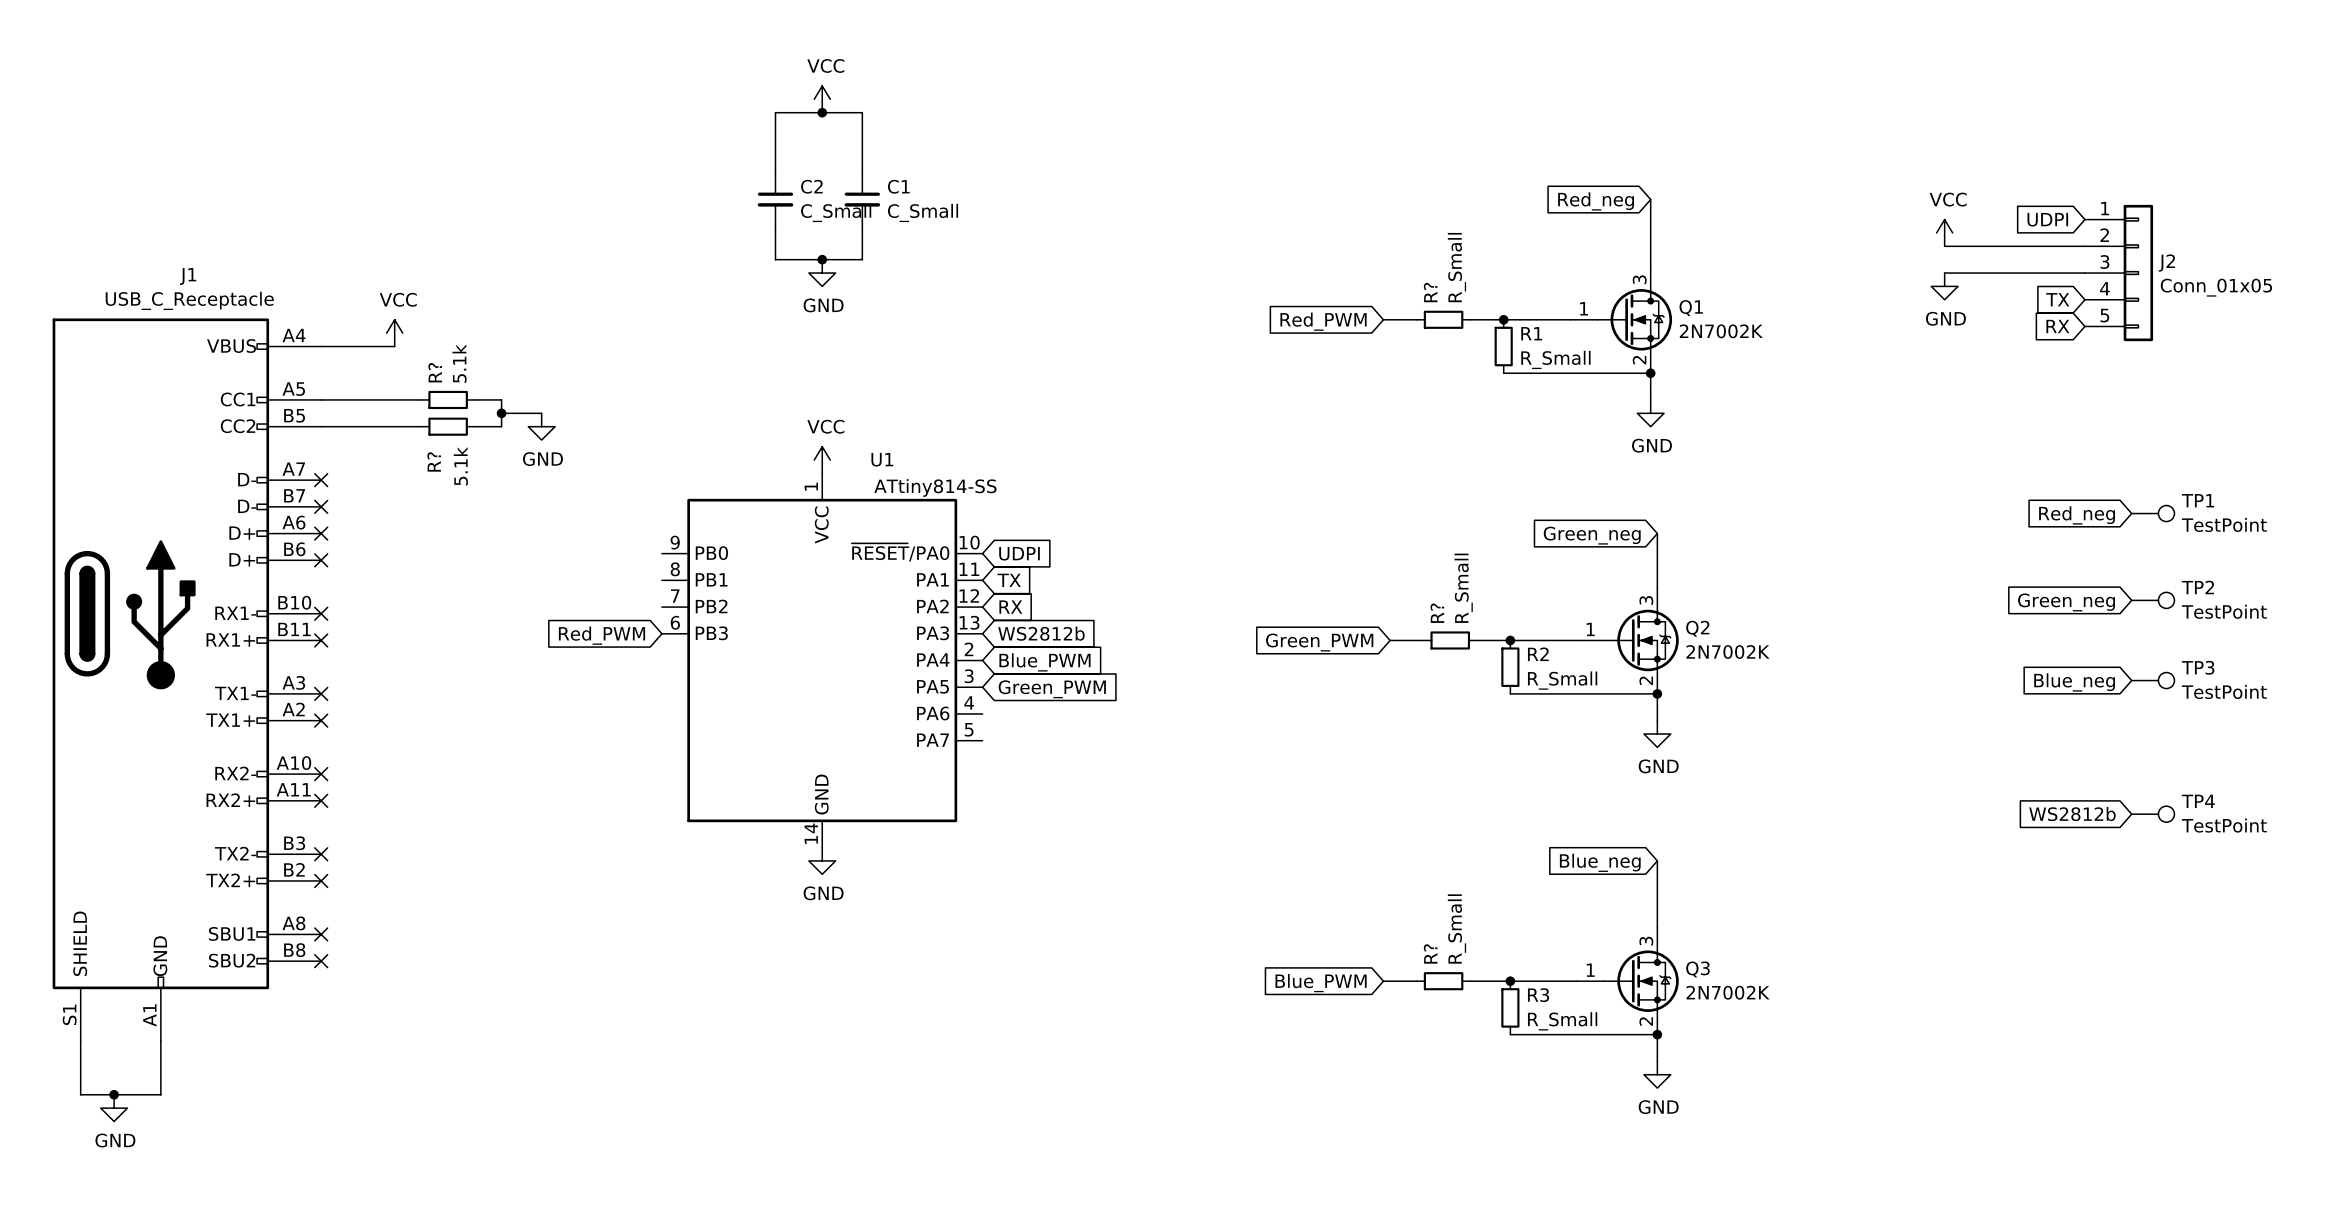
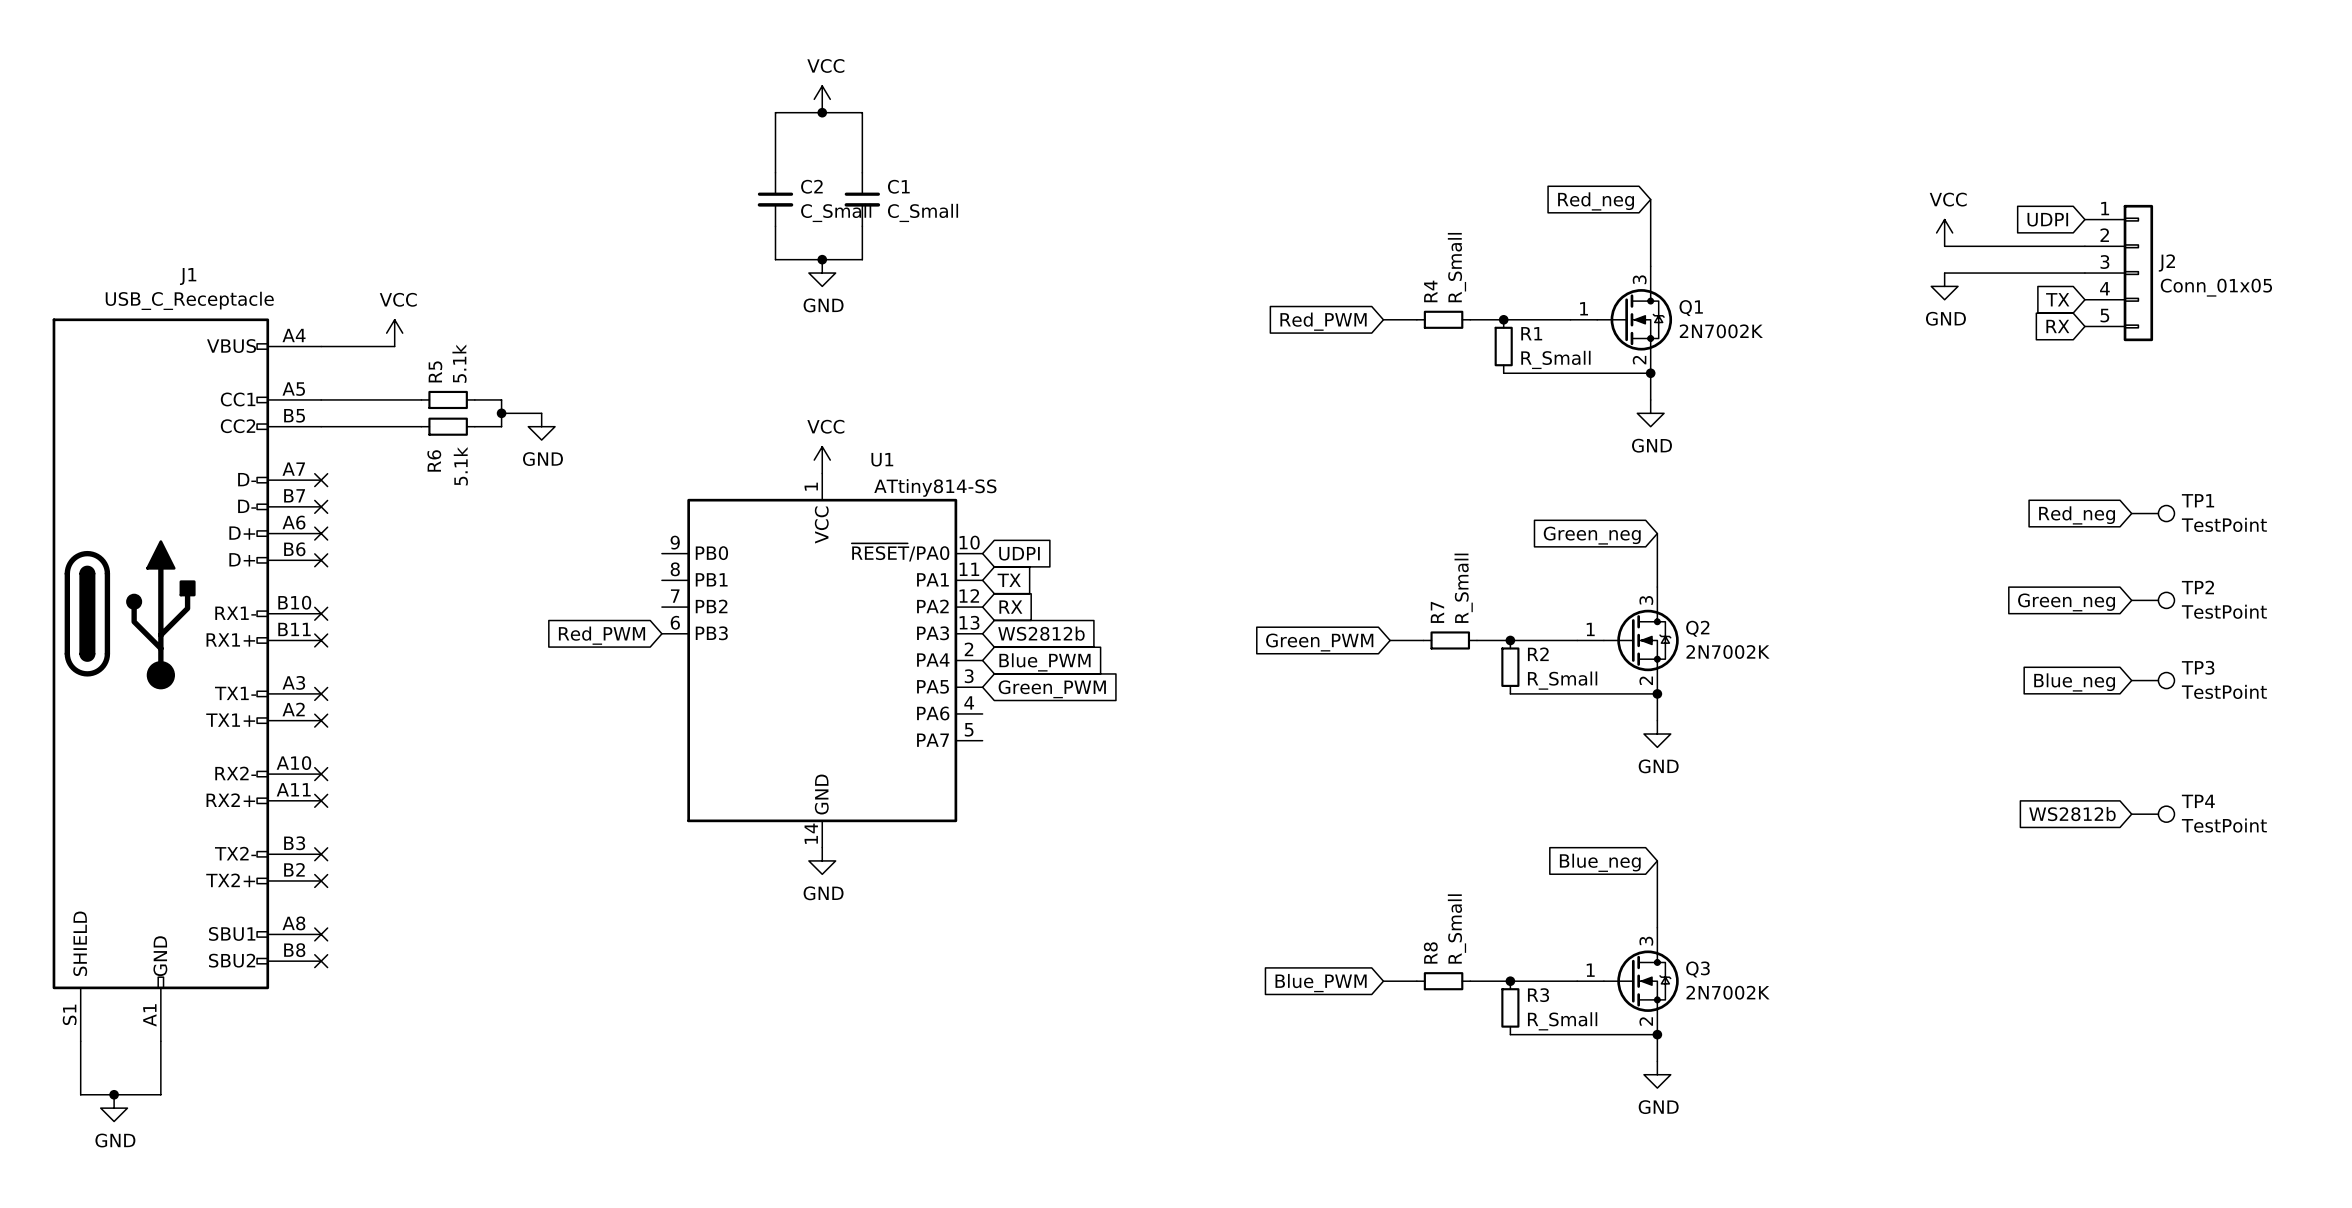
R? name: R? (1430, 292) -> R4 (1430, 291)
R? name: R? (435, 372) -> R5 (435, 371)
R? name: R? (434, 461) -> R6 (434, 460)
R? name: R? (1437, 613) -> R7 (1437, 612)
R? name: R? (1430, 953) -> R8 (1430, 952)

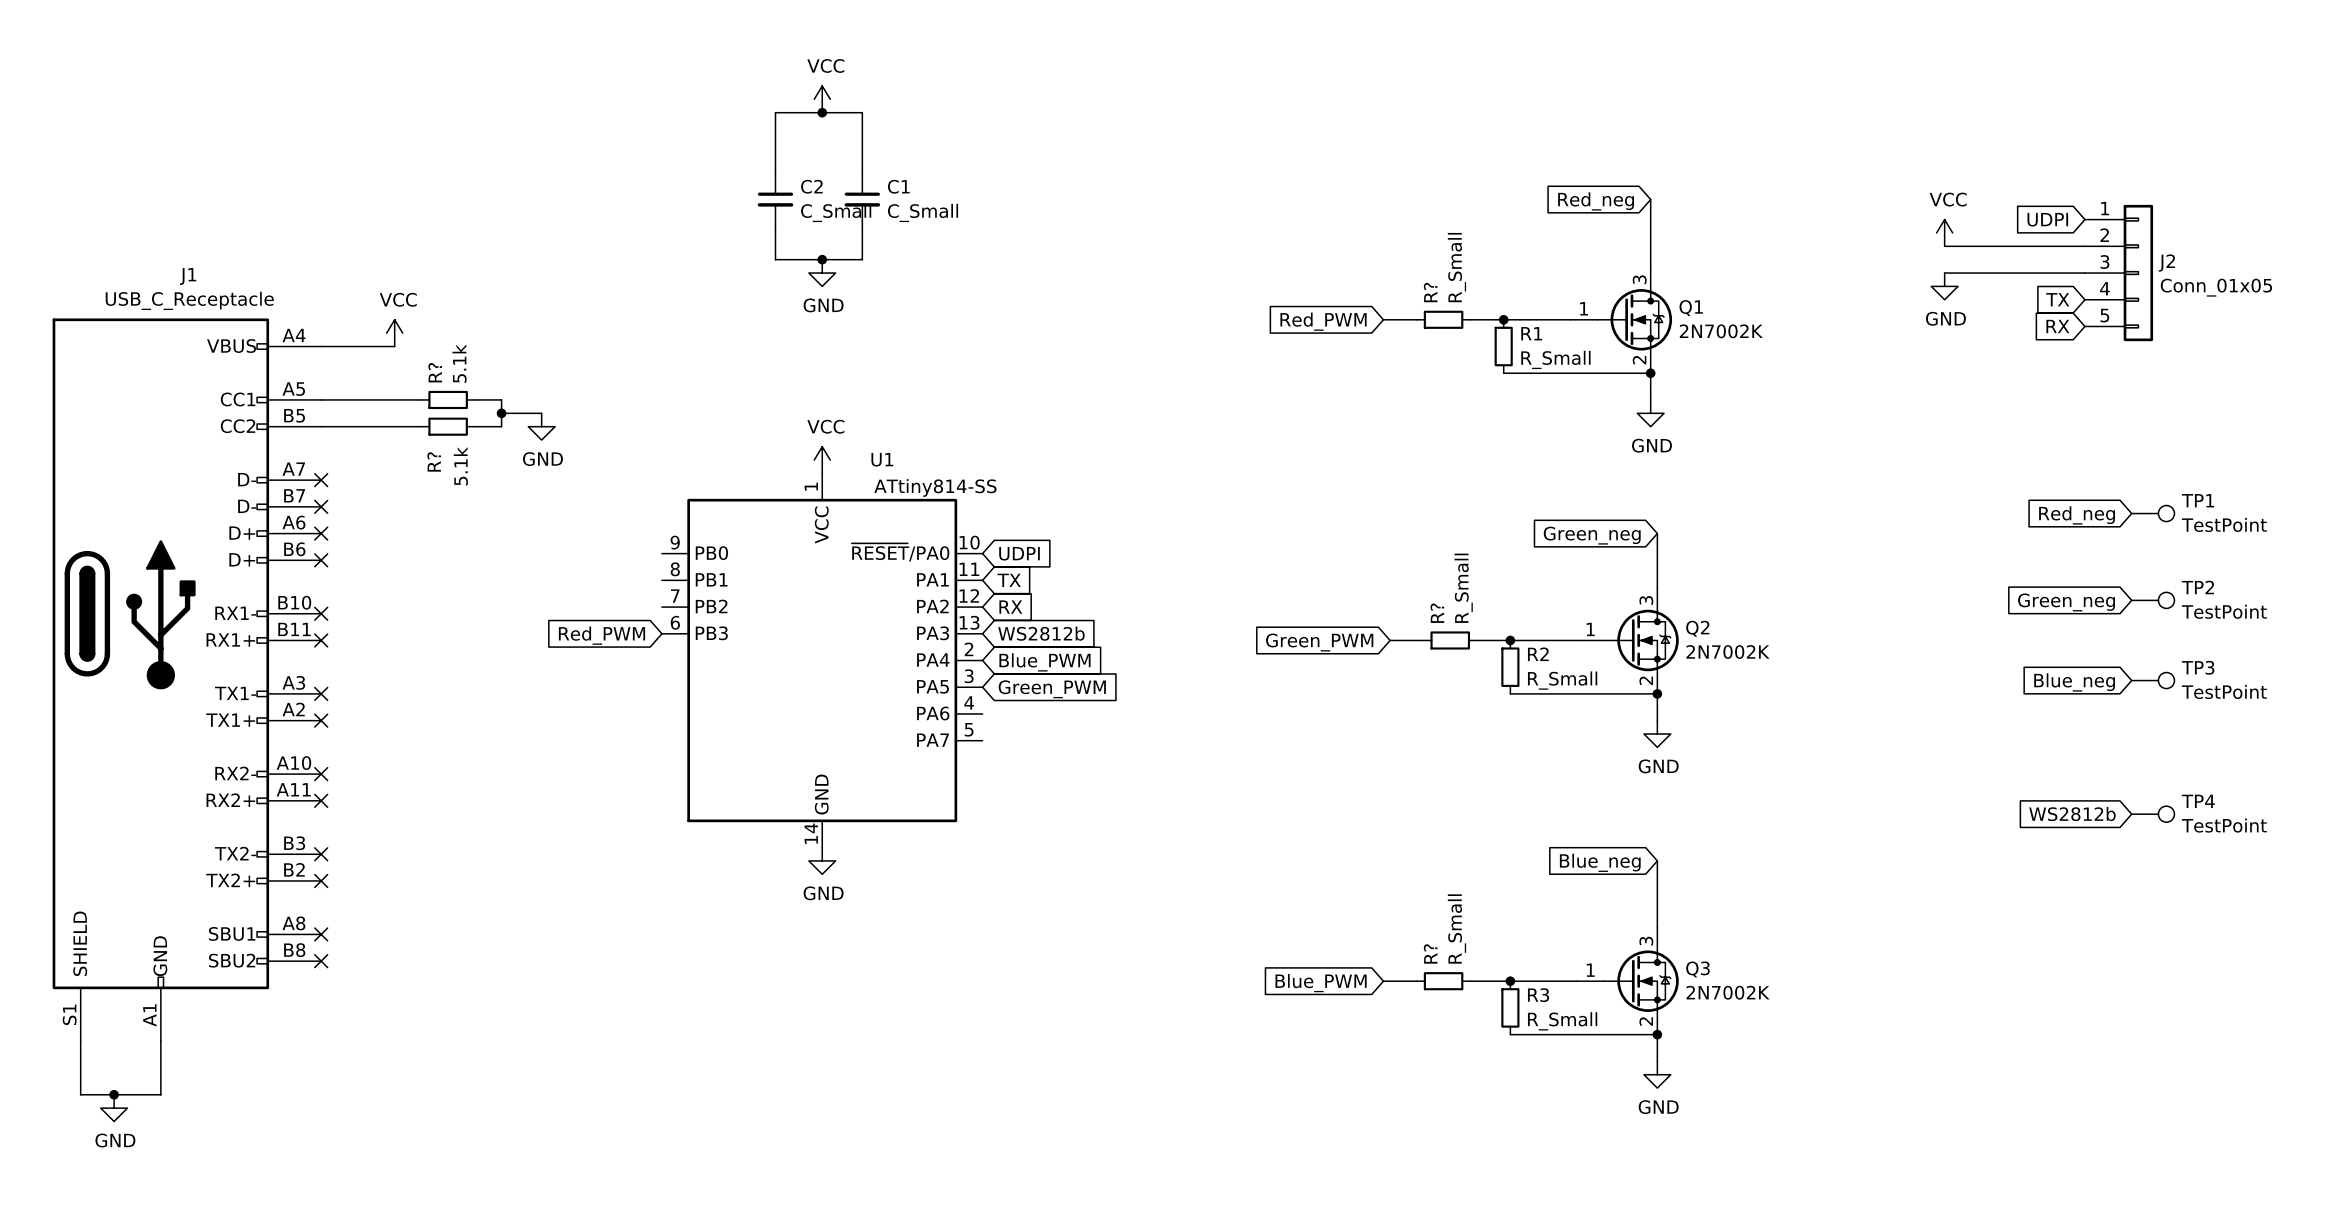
R4 name: R4 (1430, 291) -> R? (1430, 292)
R5 name: R5 (435, 371) -> R? (435, 372)
R6 name: R6 (434, 460) -> R? (434, 461)
R7 name: R7 (1437, 612) -> R? (1437, 613)
R8 name: R8 (1430, 952) -> R? (1430, 953)

